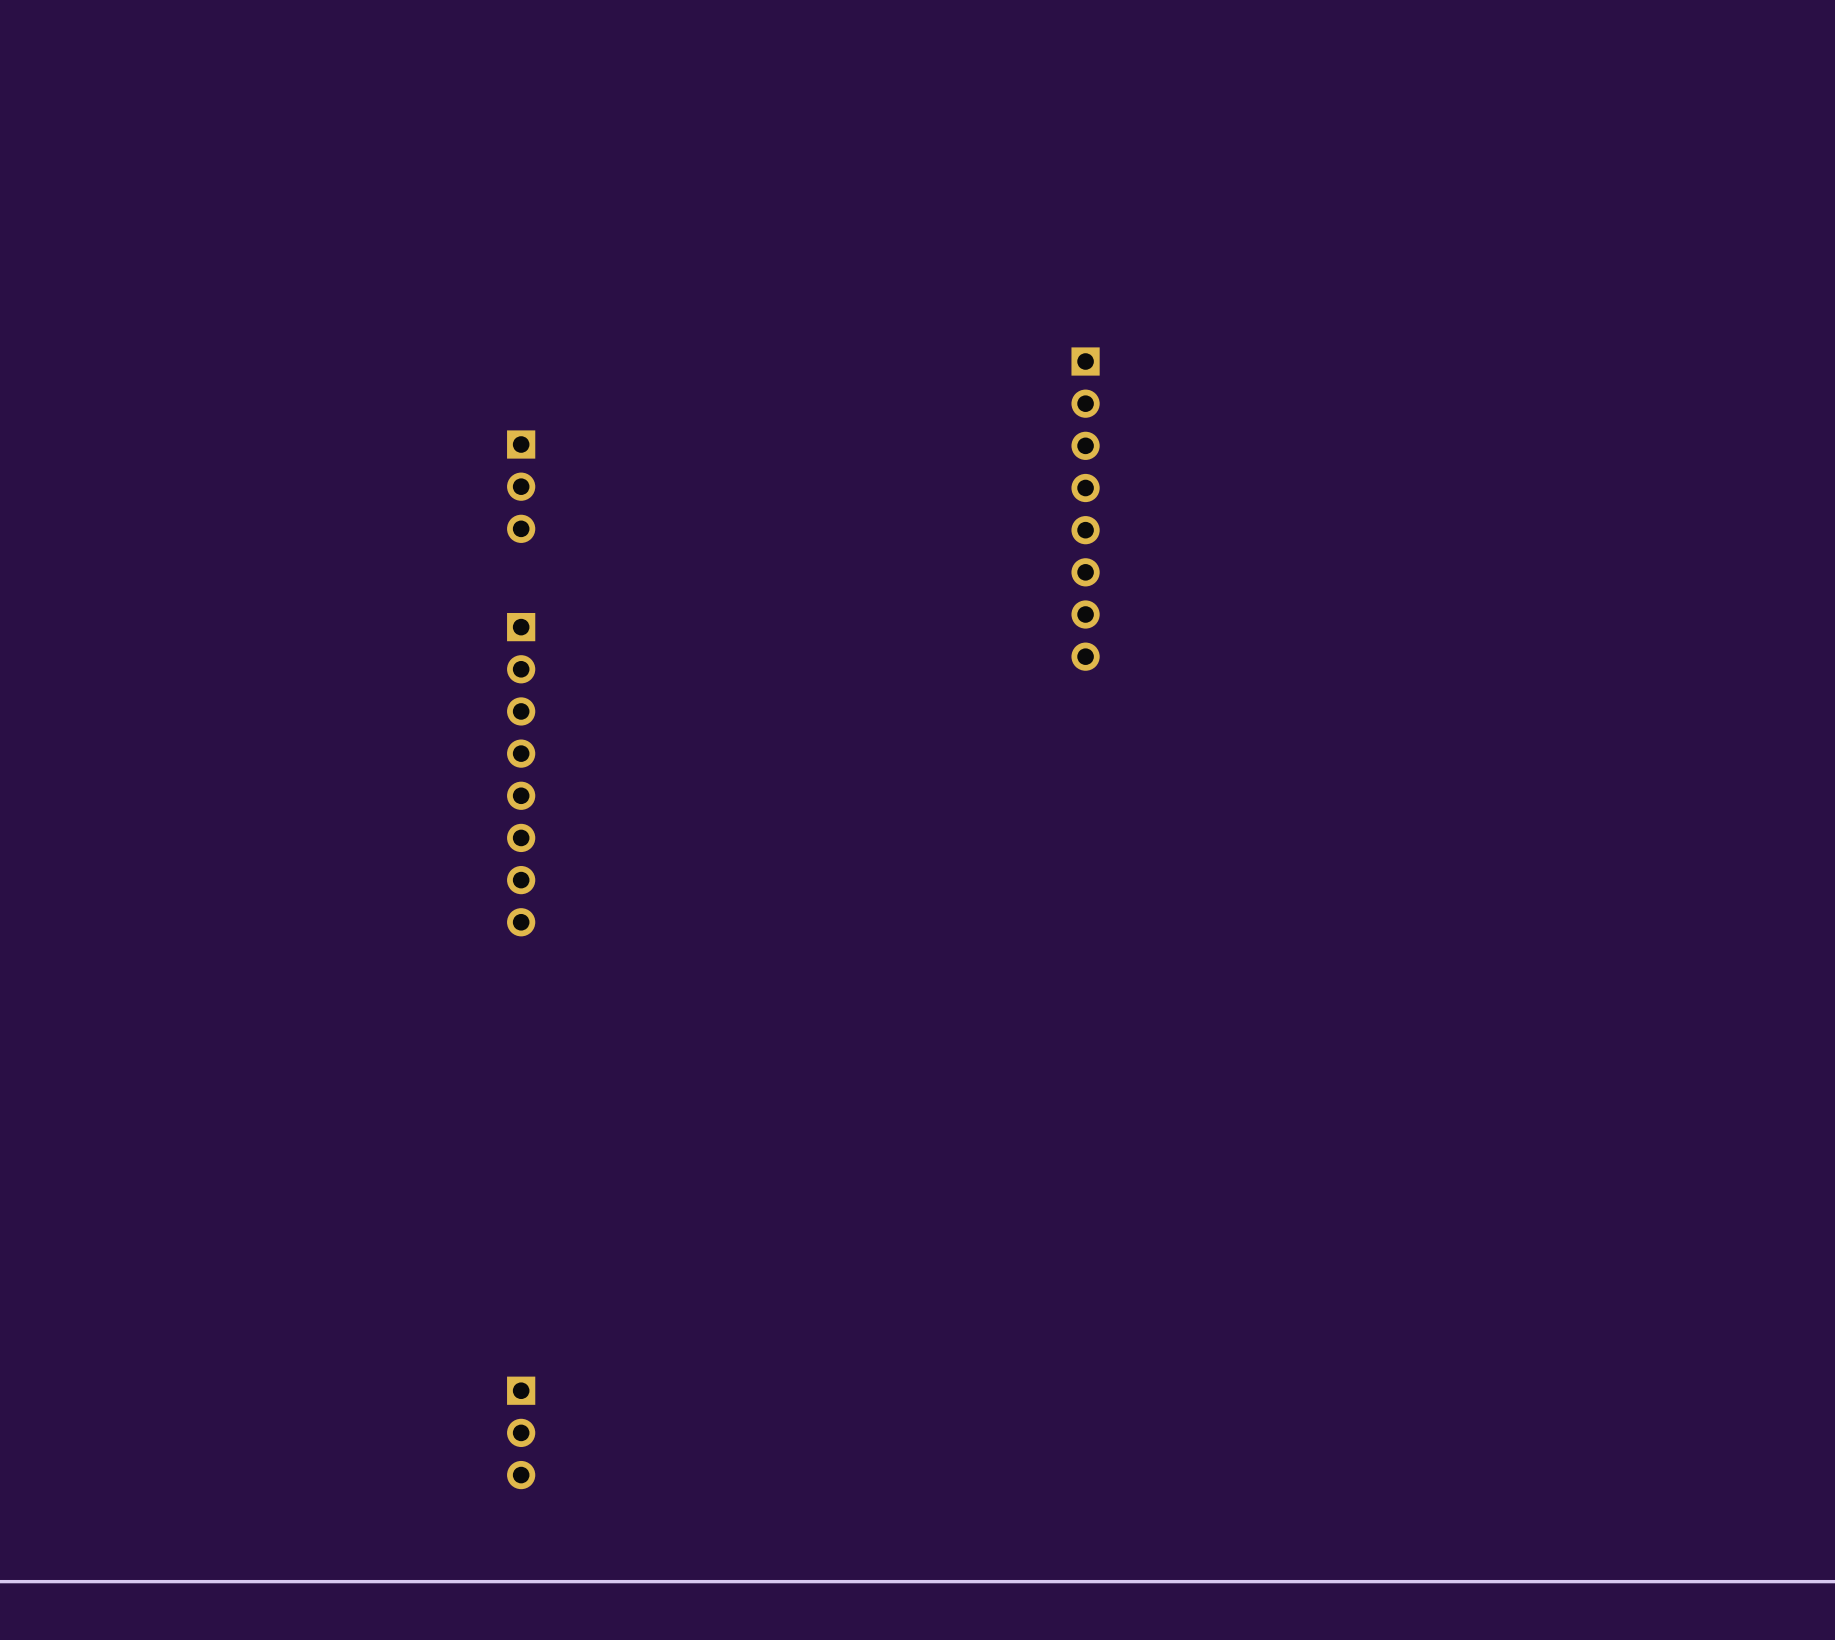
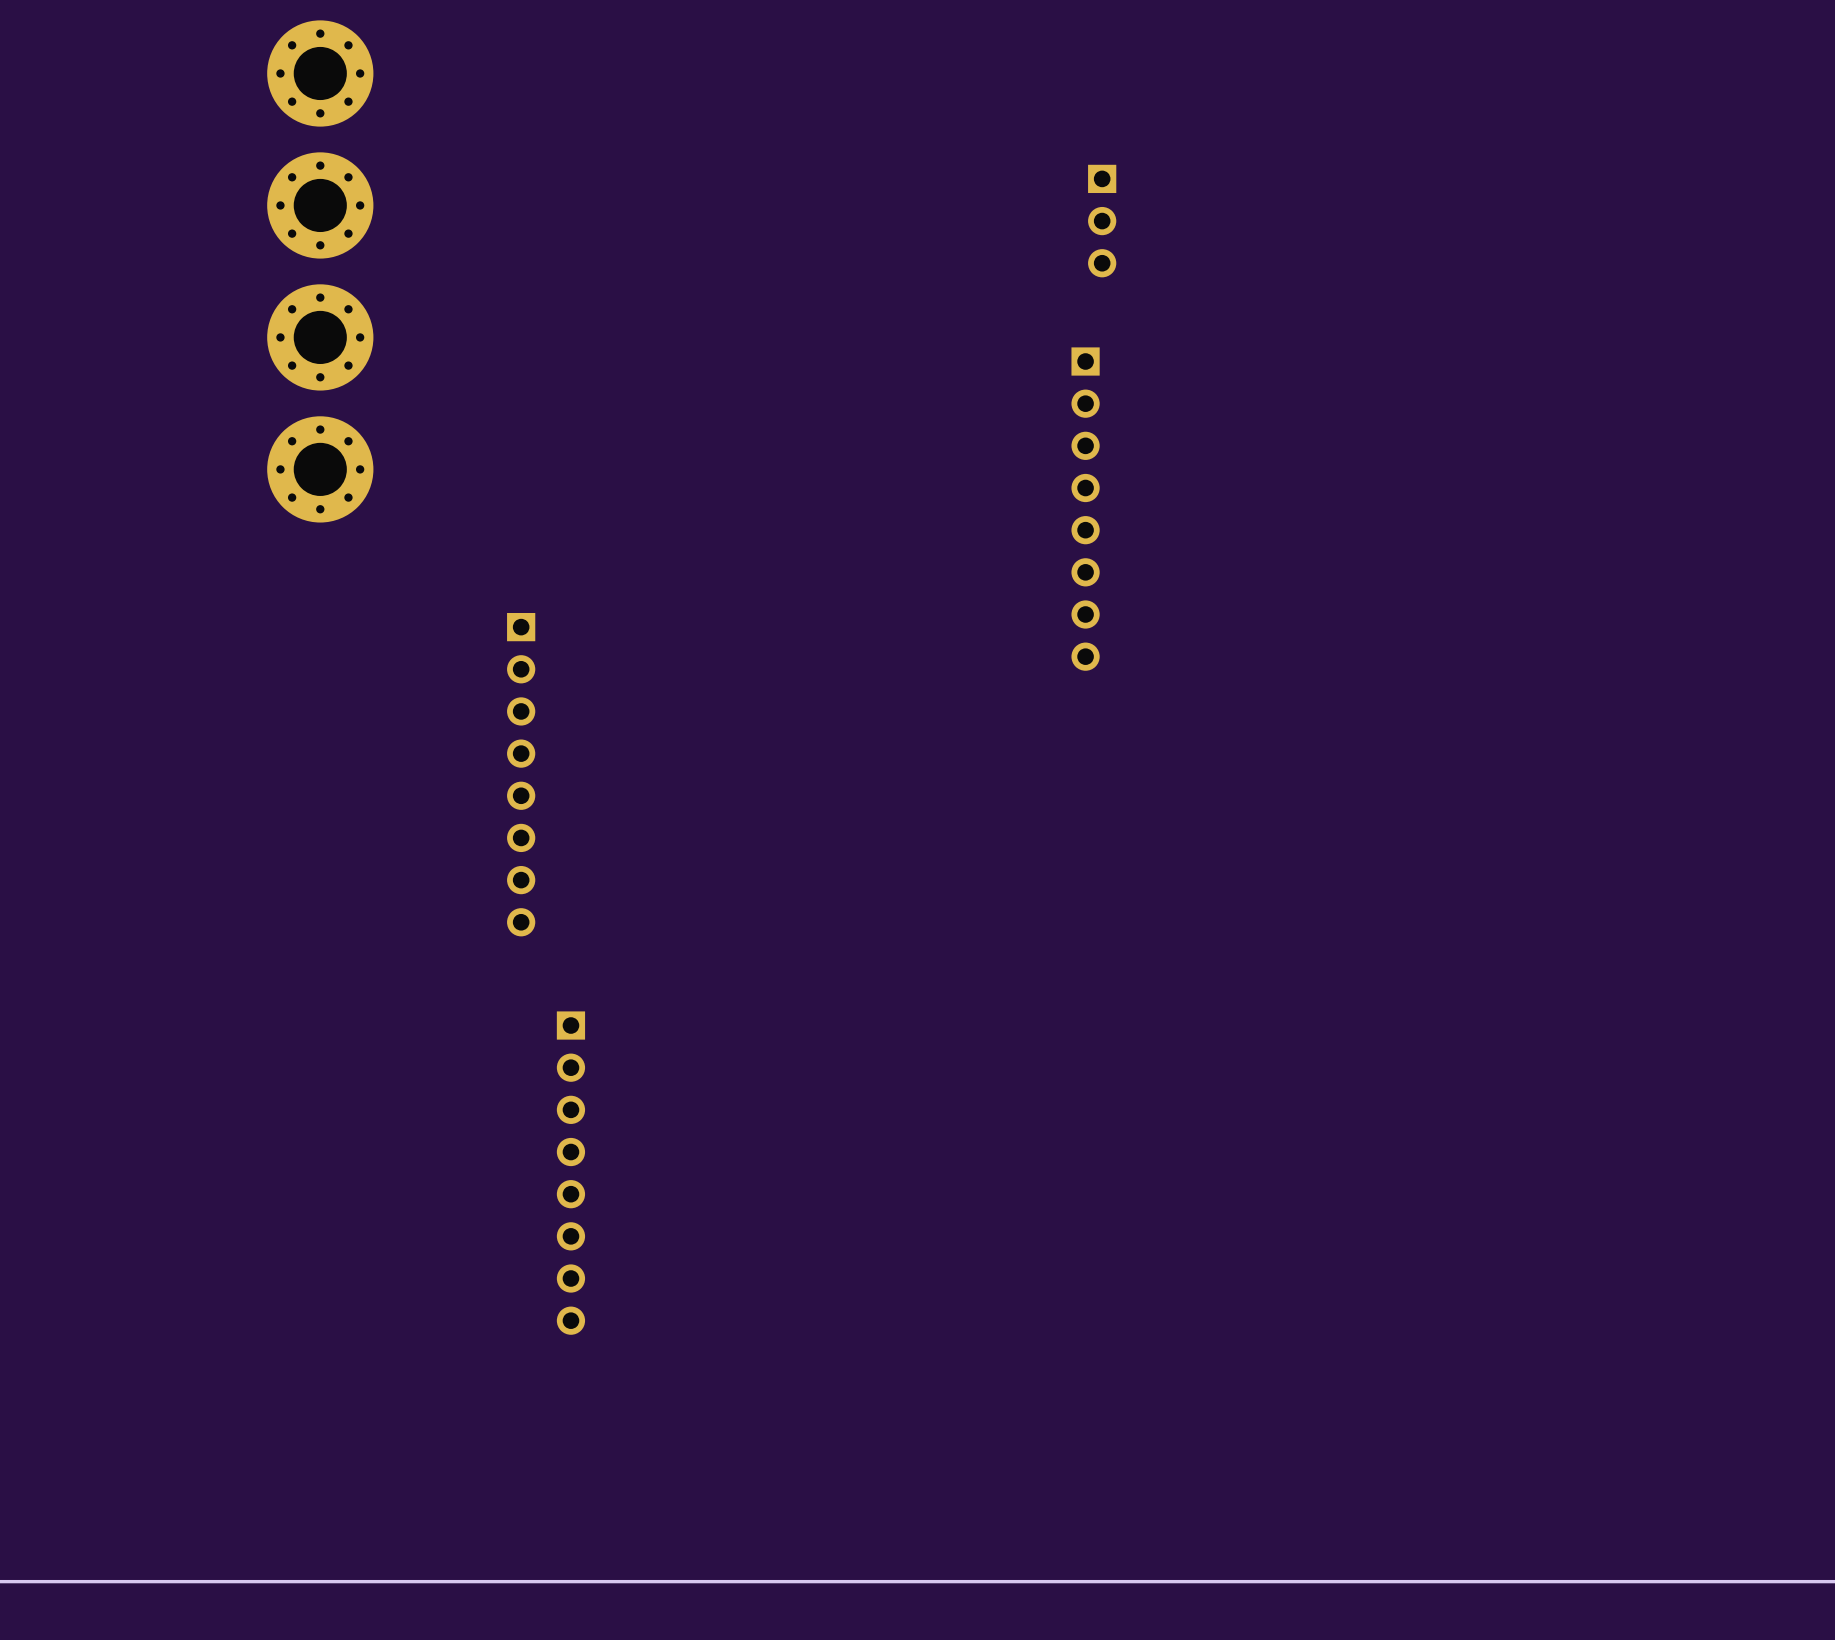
part: none -> (320, 73)
part: none -> (320, 205)
part: none -> (1102, 221)
part: none -> (320, 337)
part: none -> (320, 469)
part: (521, 486) -> none
part: none -> (570, 1173)
part: (521, 1432) -> none

